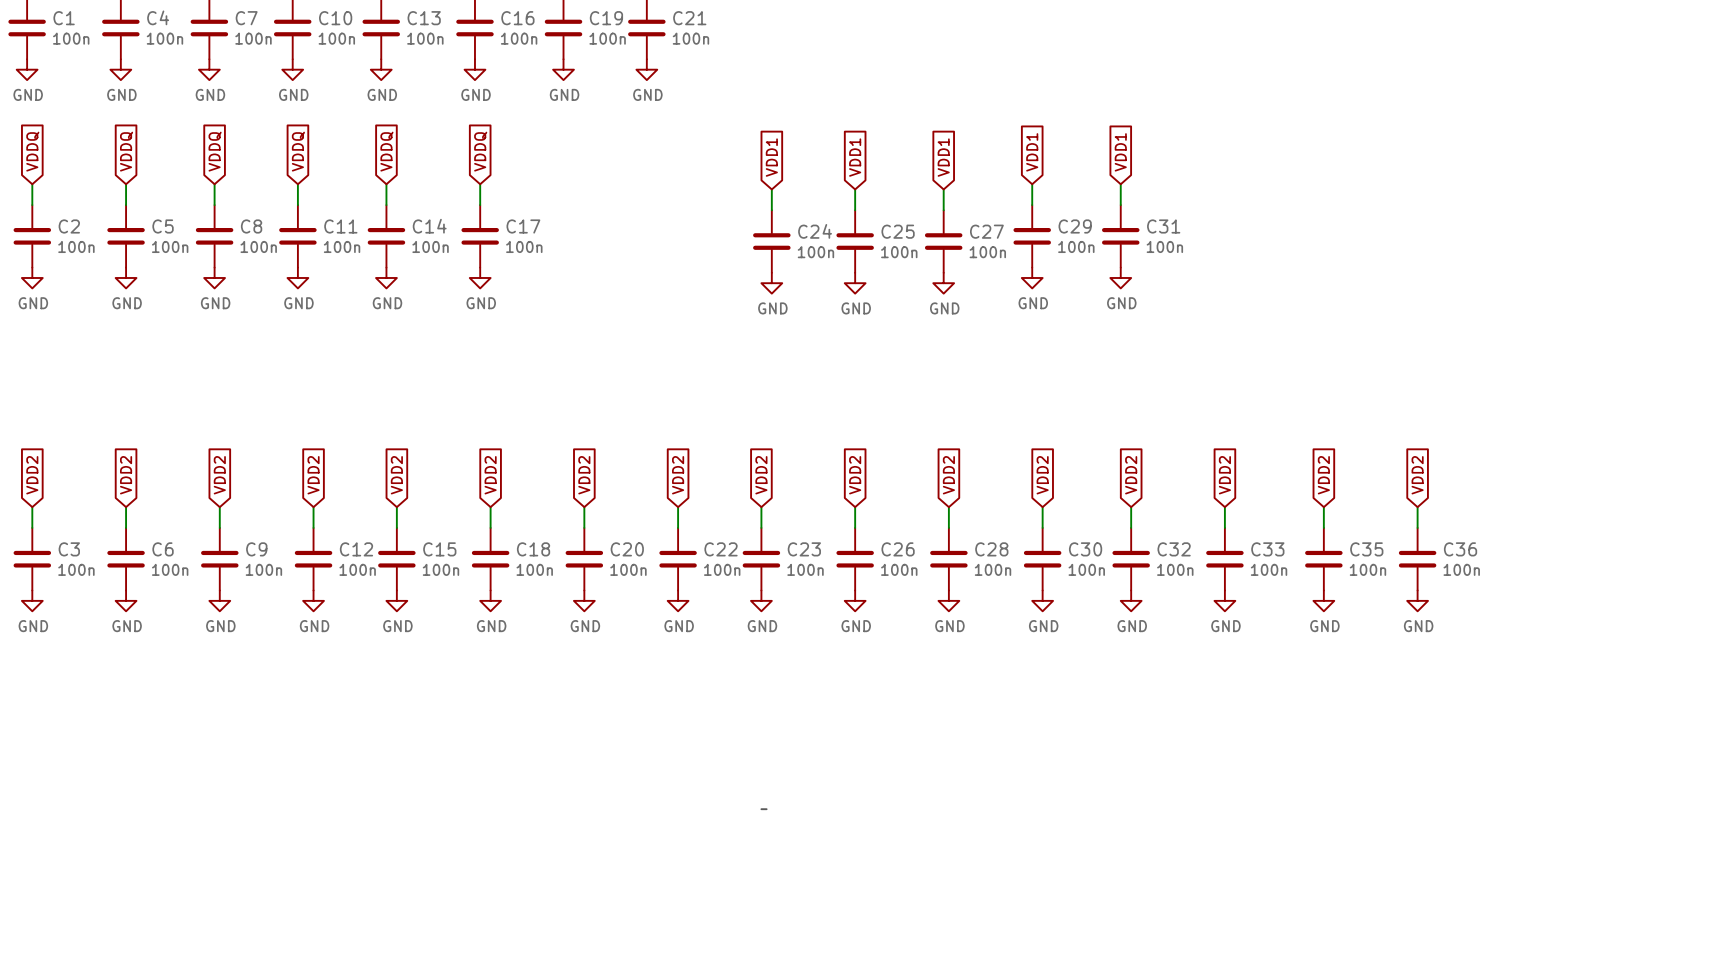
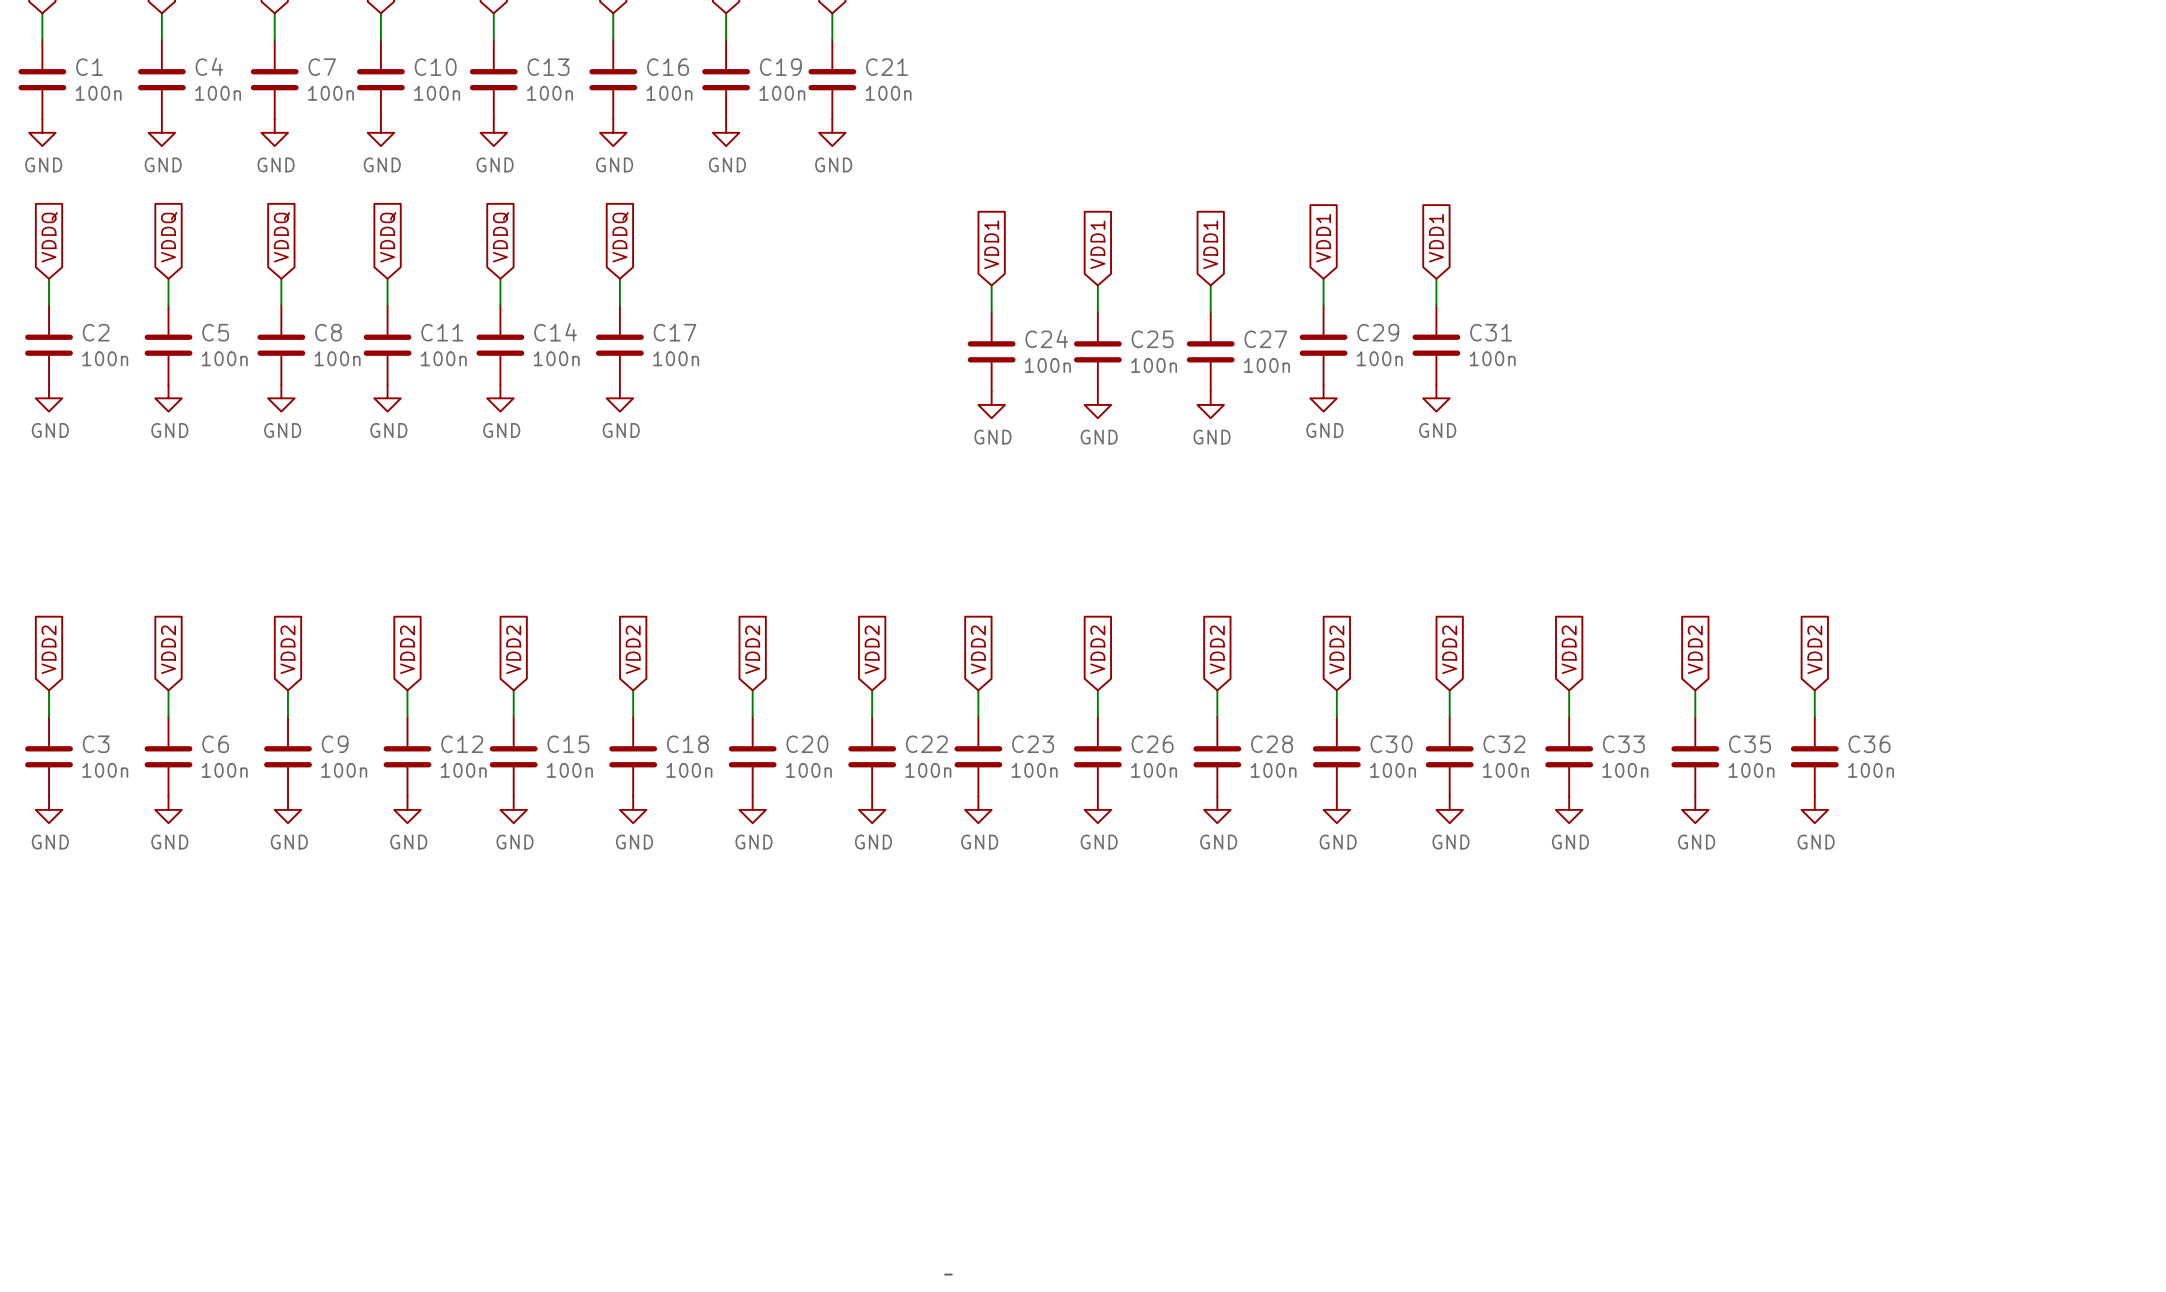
line: (761, 809) (766, 809) -> (945, 1274) (951, 1274)

